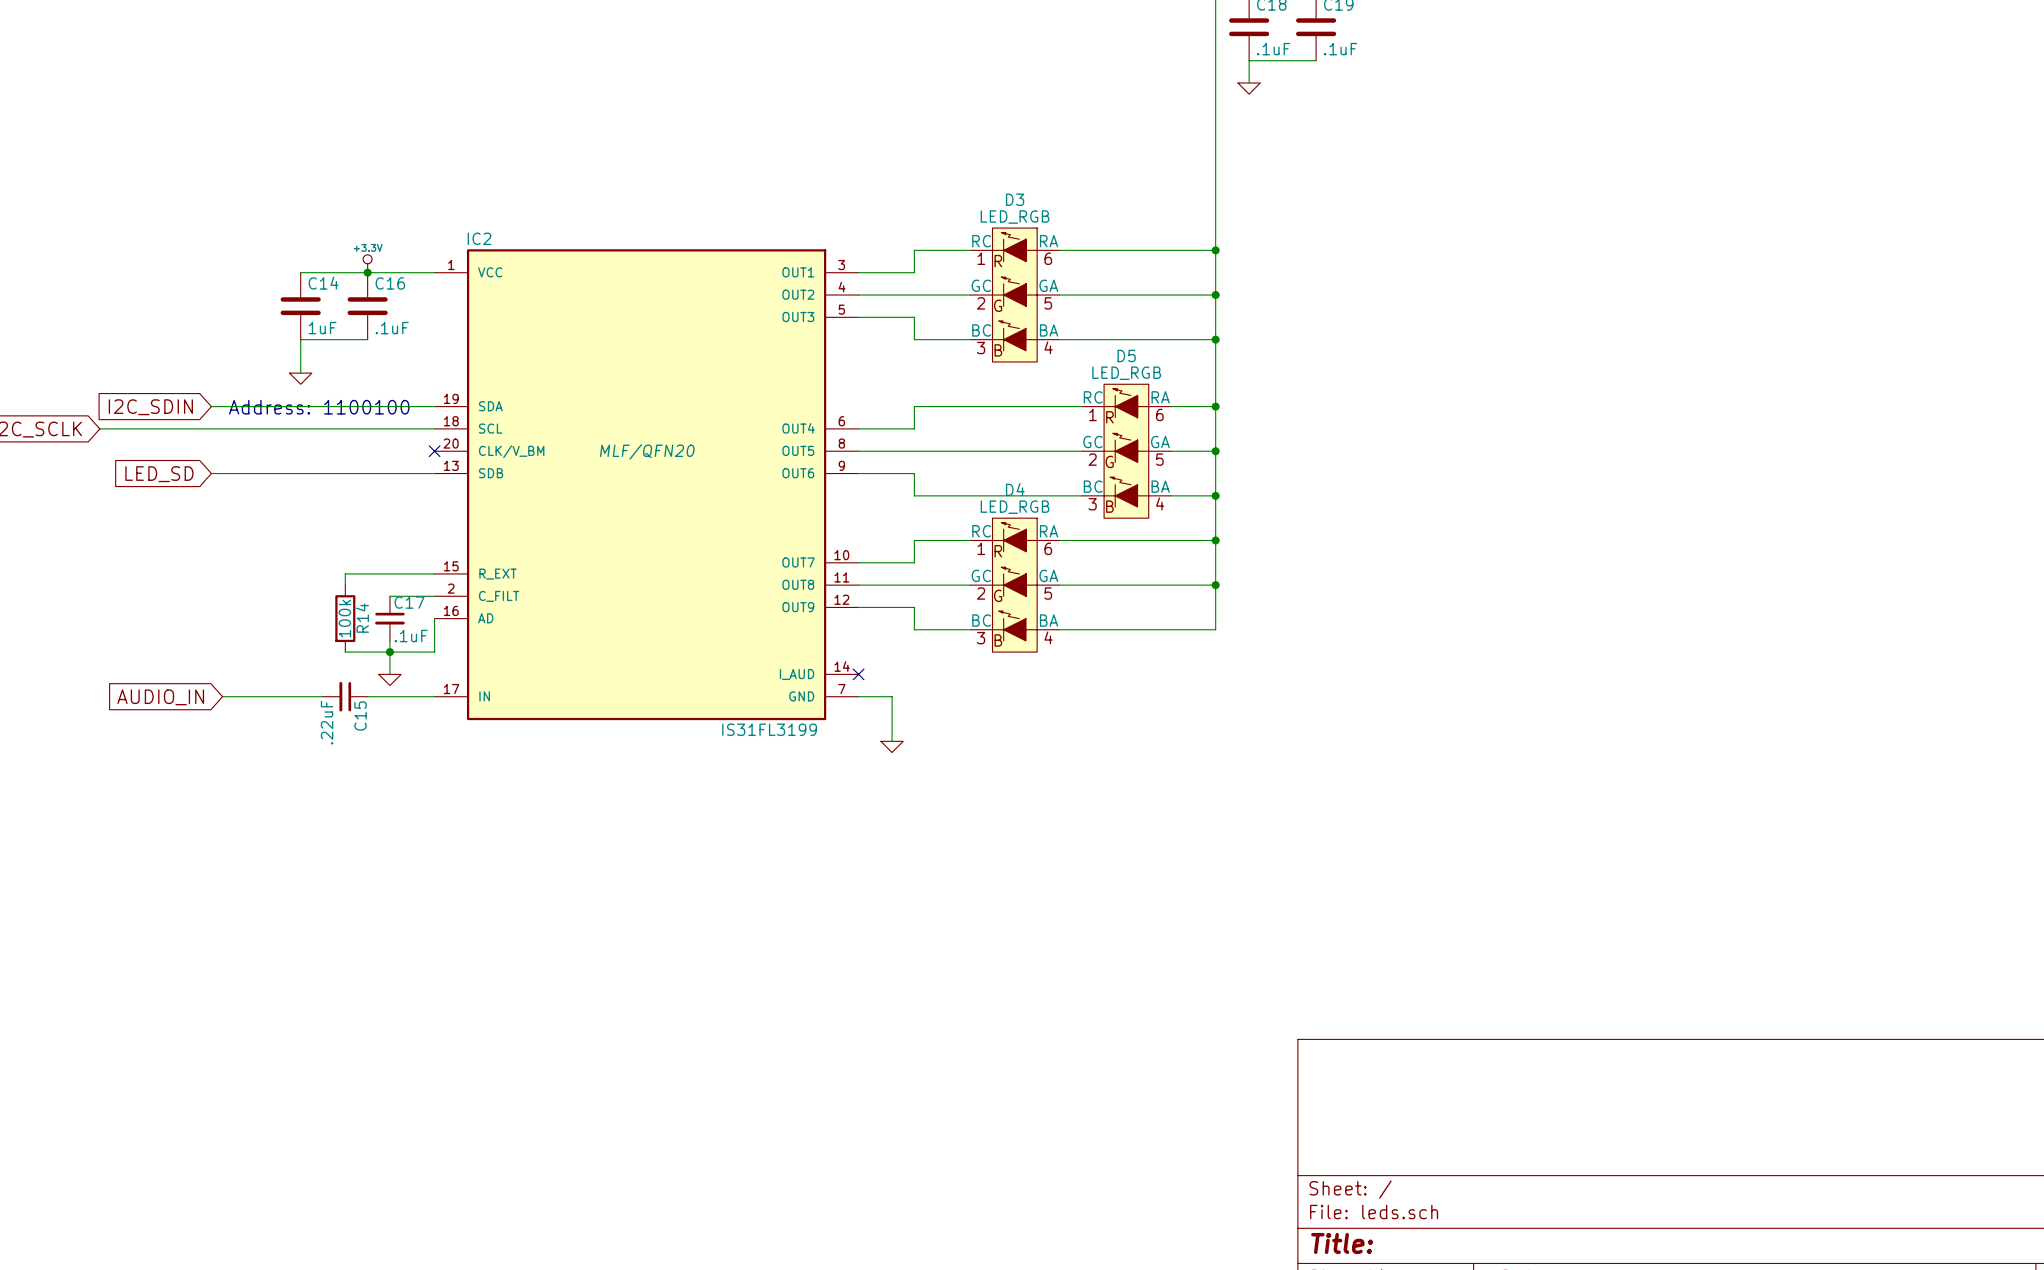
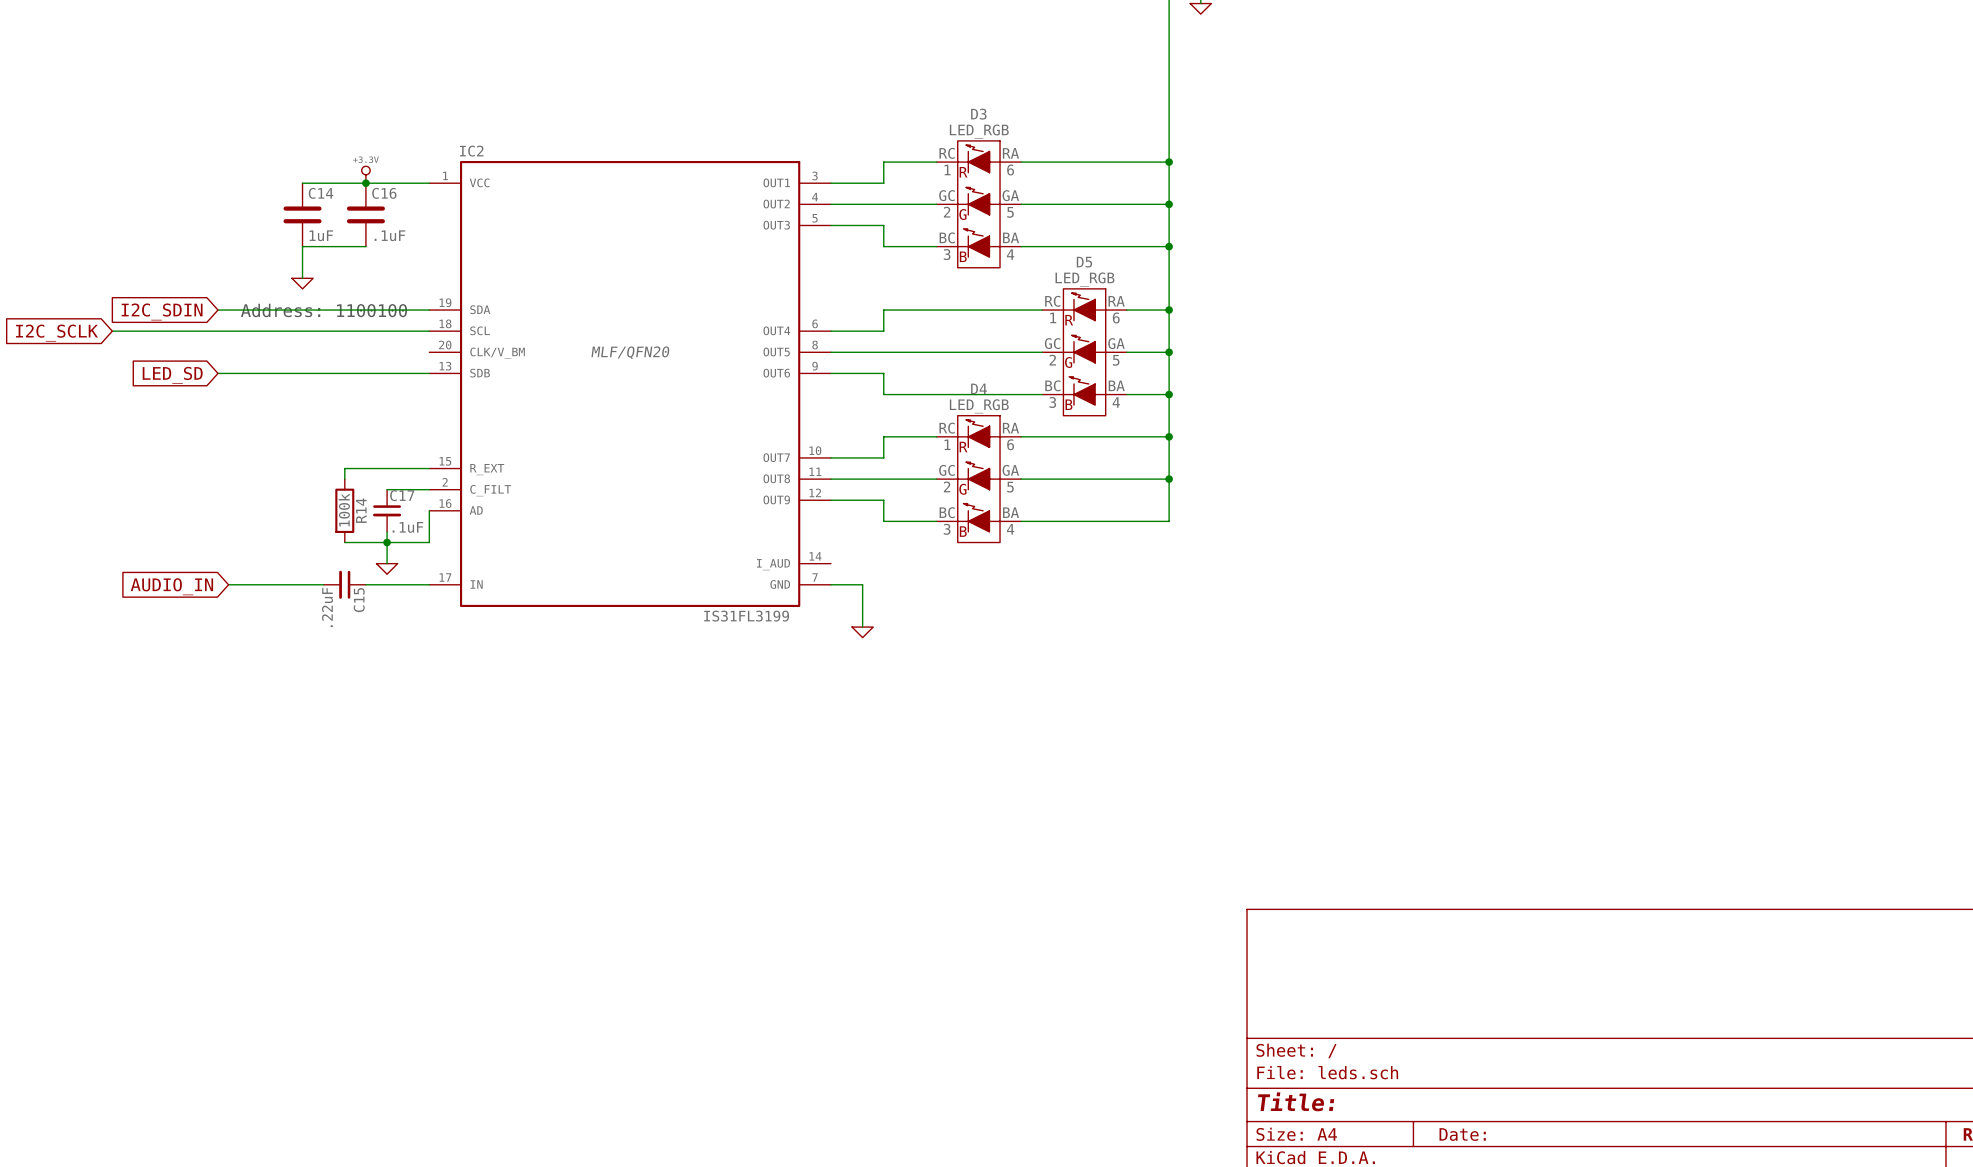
no-connect mark: (434, 451) -> none
no-connect mark: (858, 674) -> none

